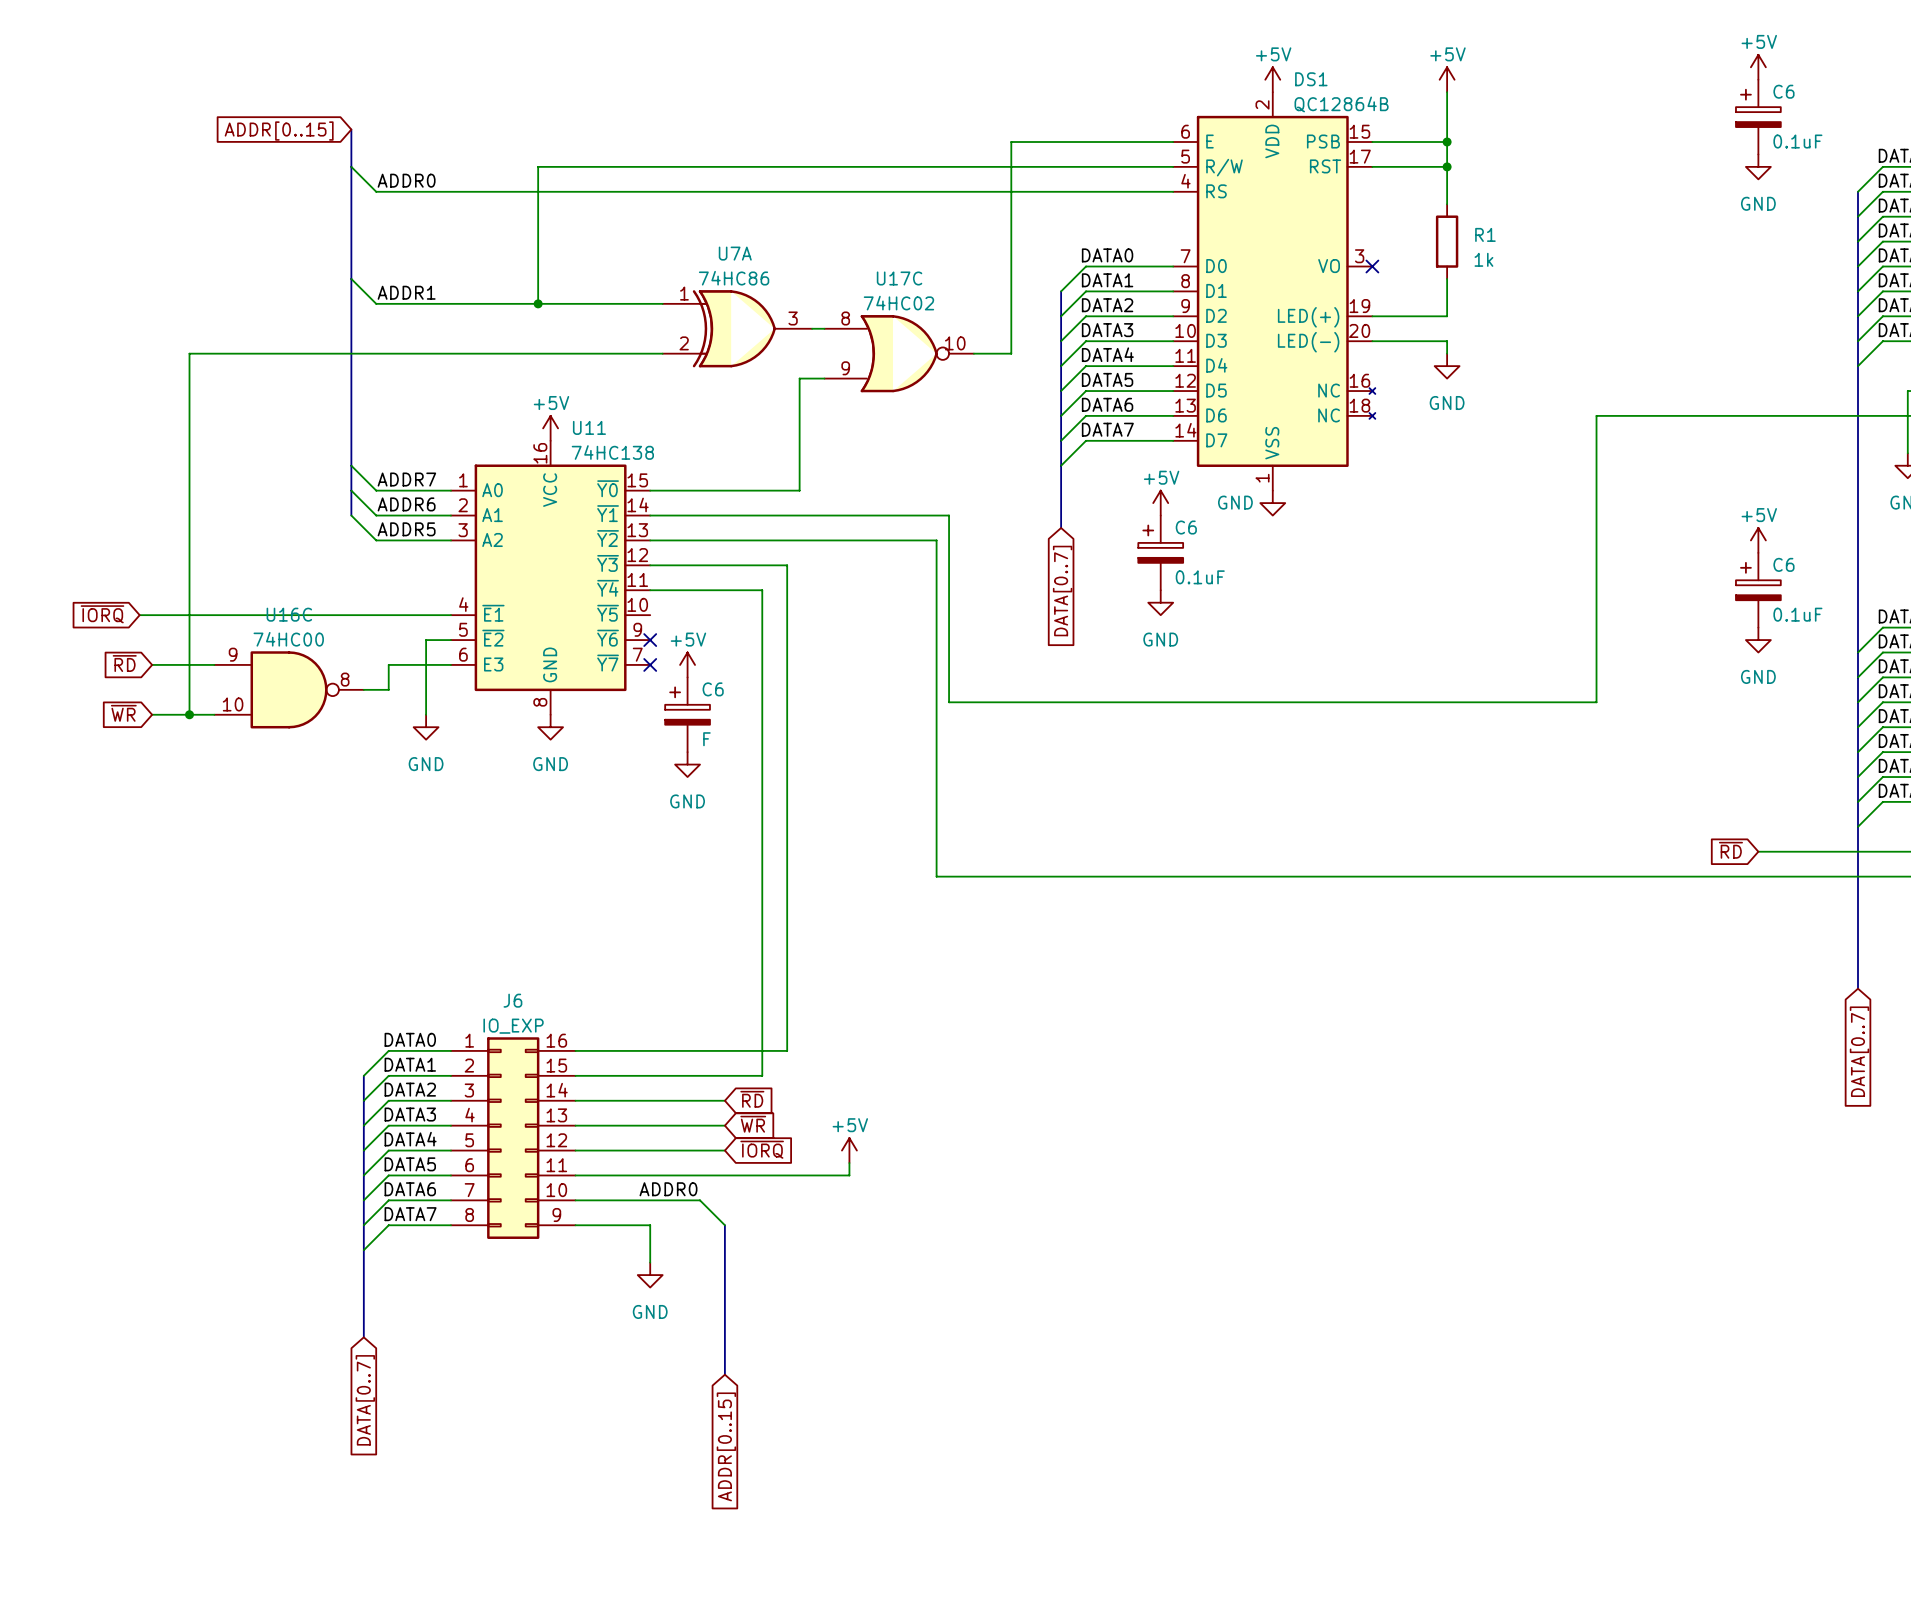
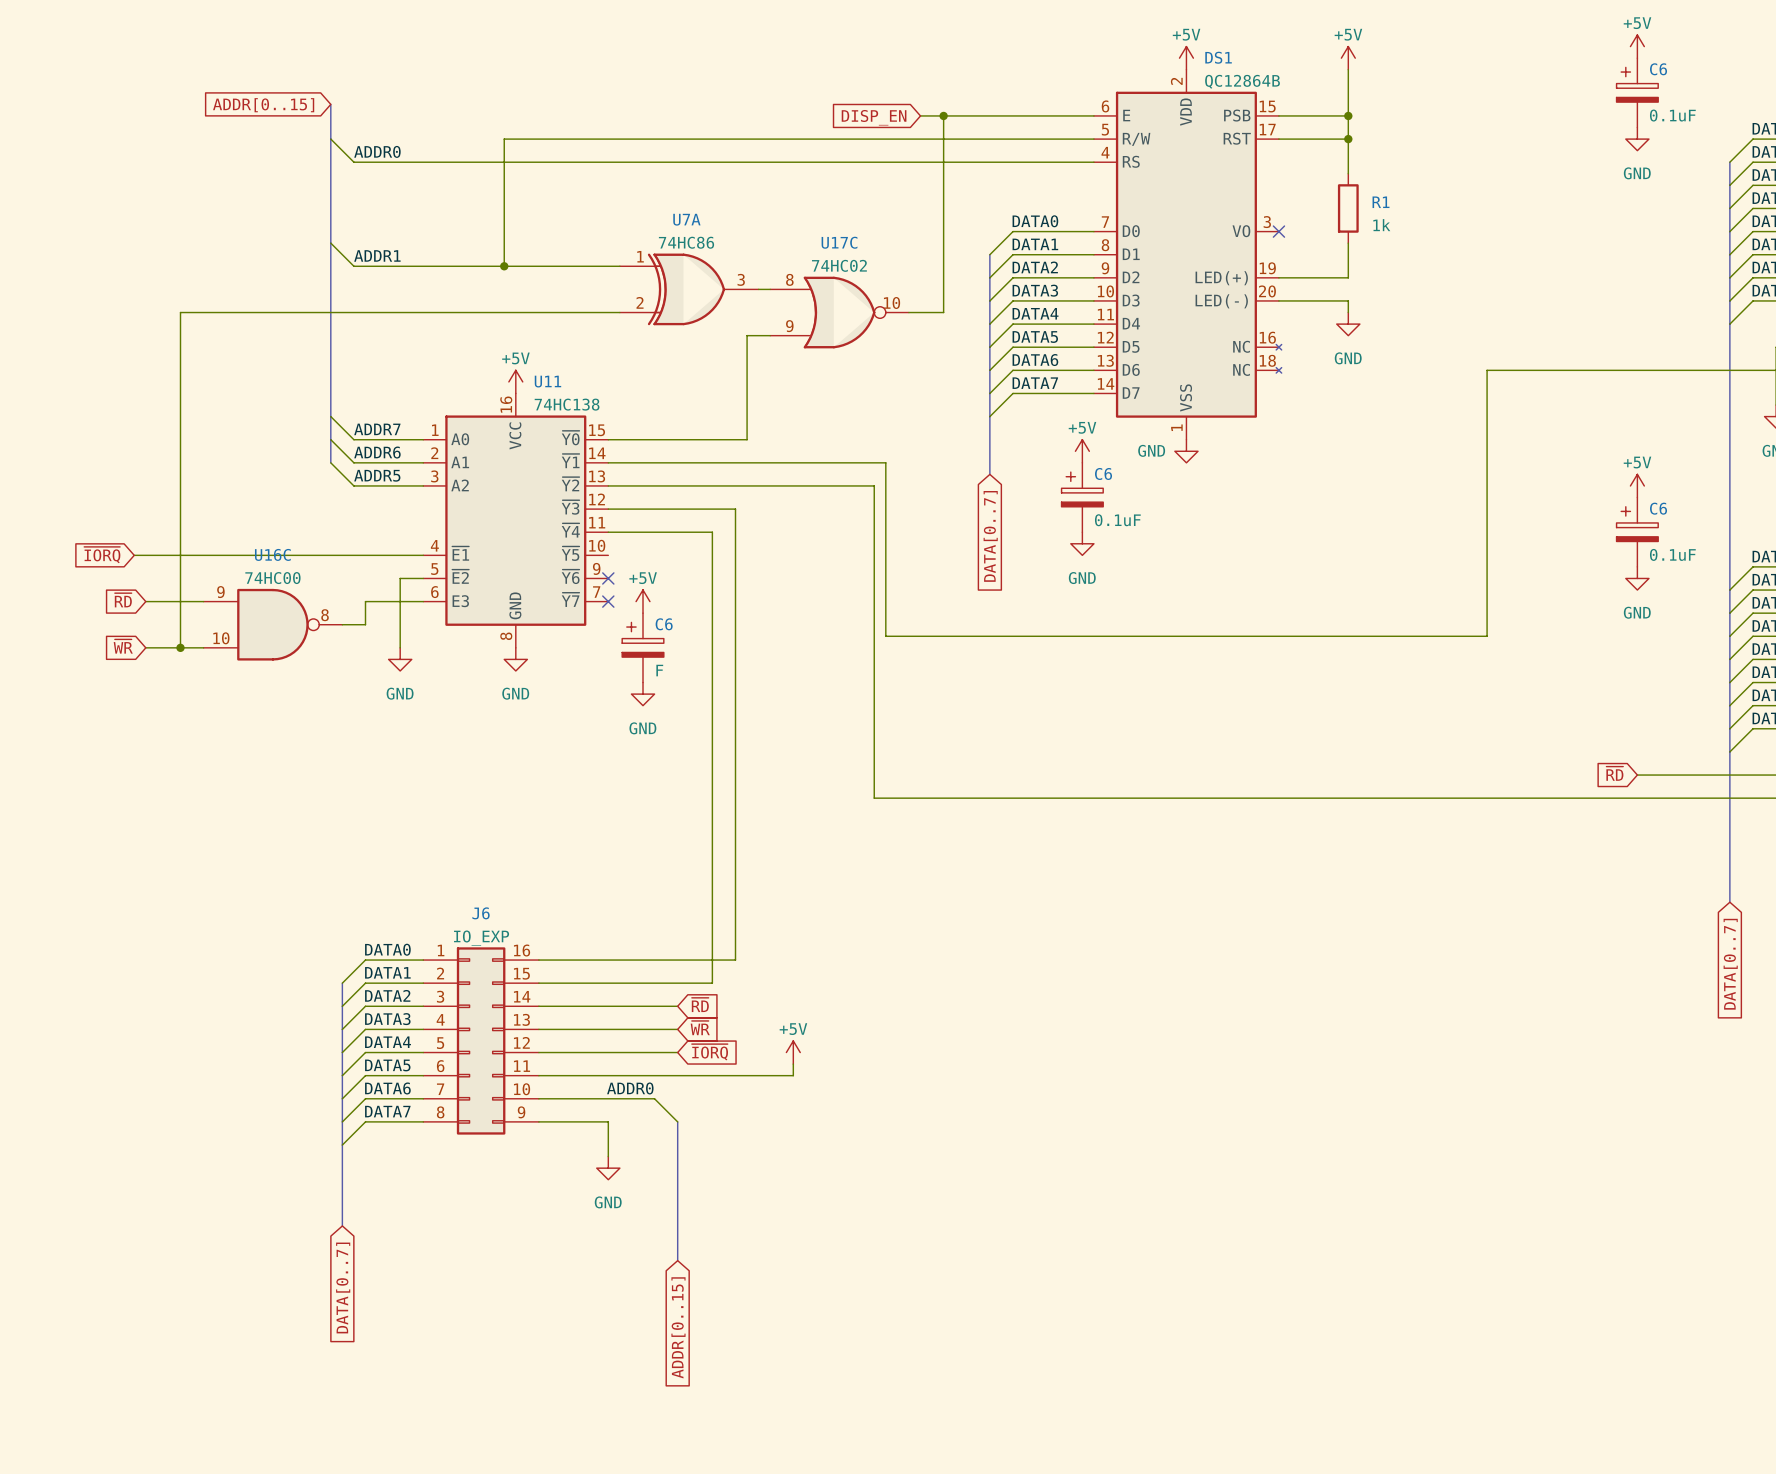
wire: none -> (920, 115) (943, 115)
junction: none -> (943, 115)
global label: none -> DISP_EN (874, 117)

